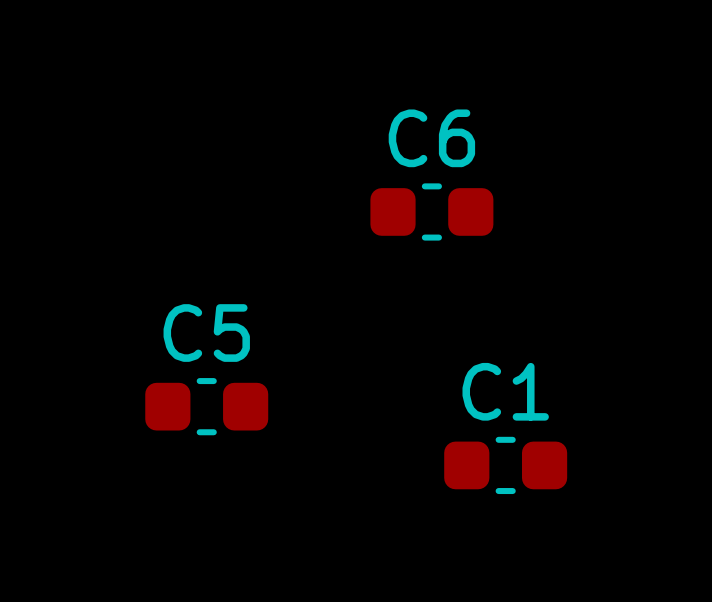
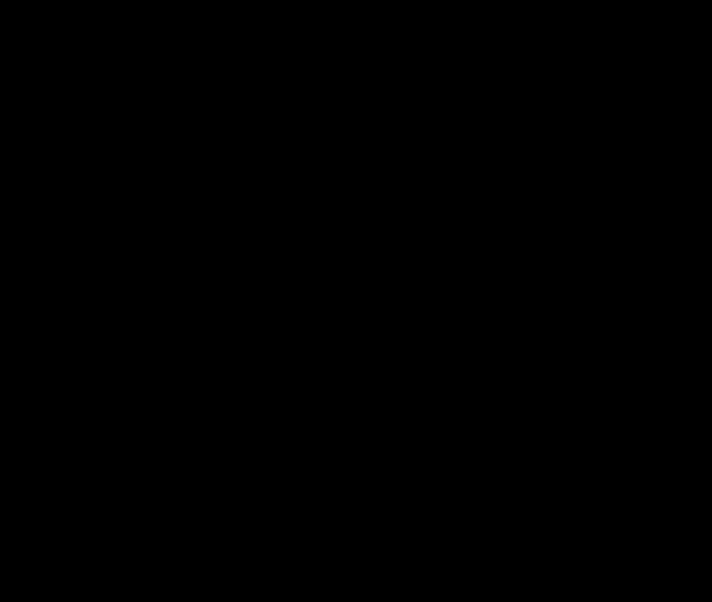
C6: (431, 211) -> none
C5: (206, 406) -> none
C1: (505, 465) -> none

